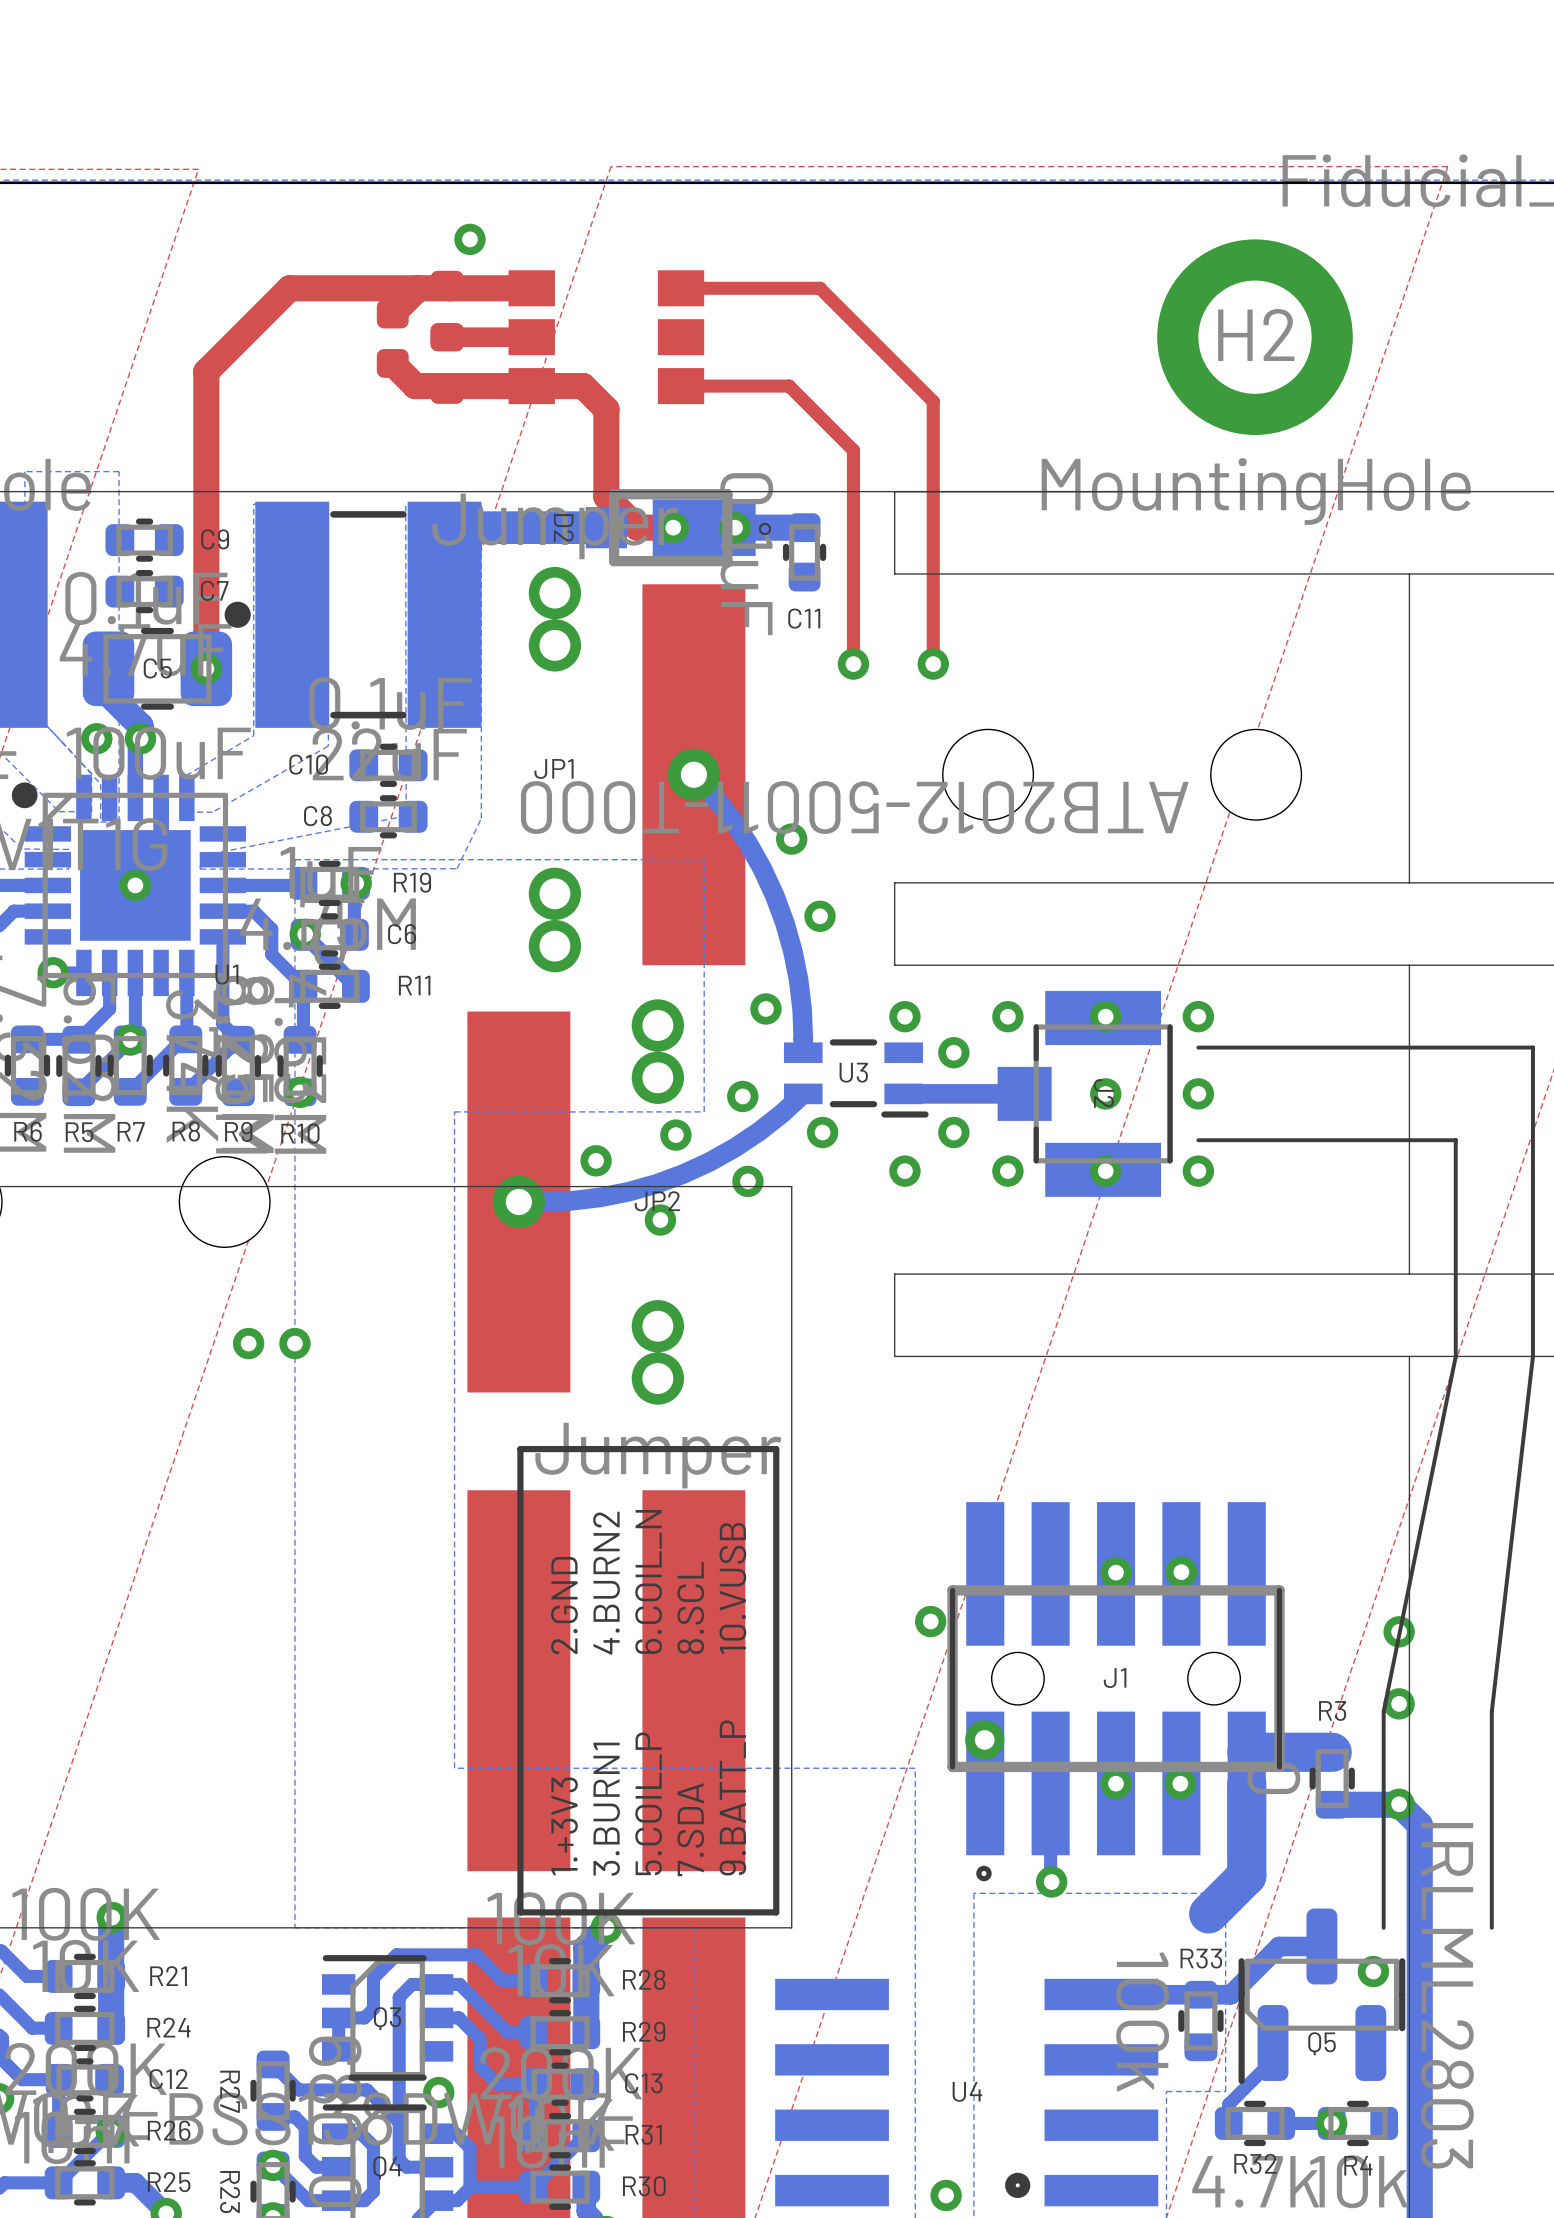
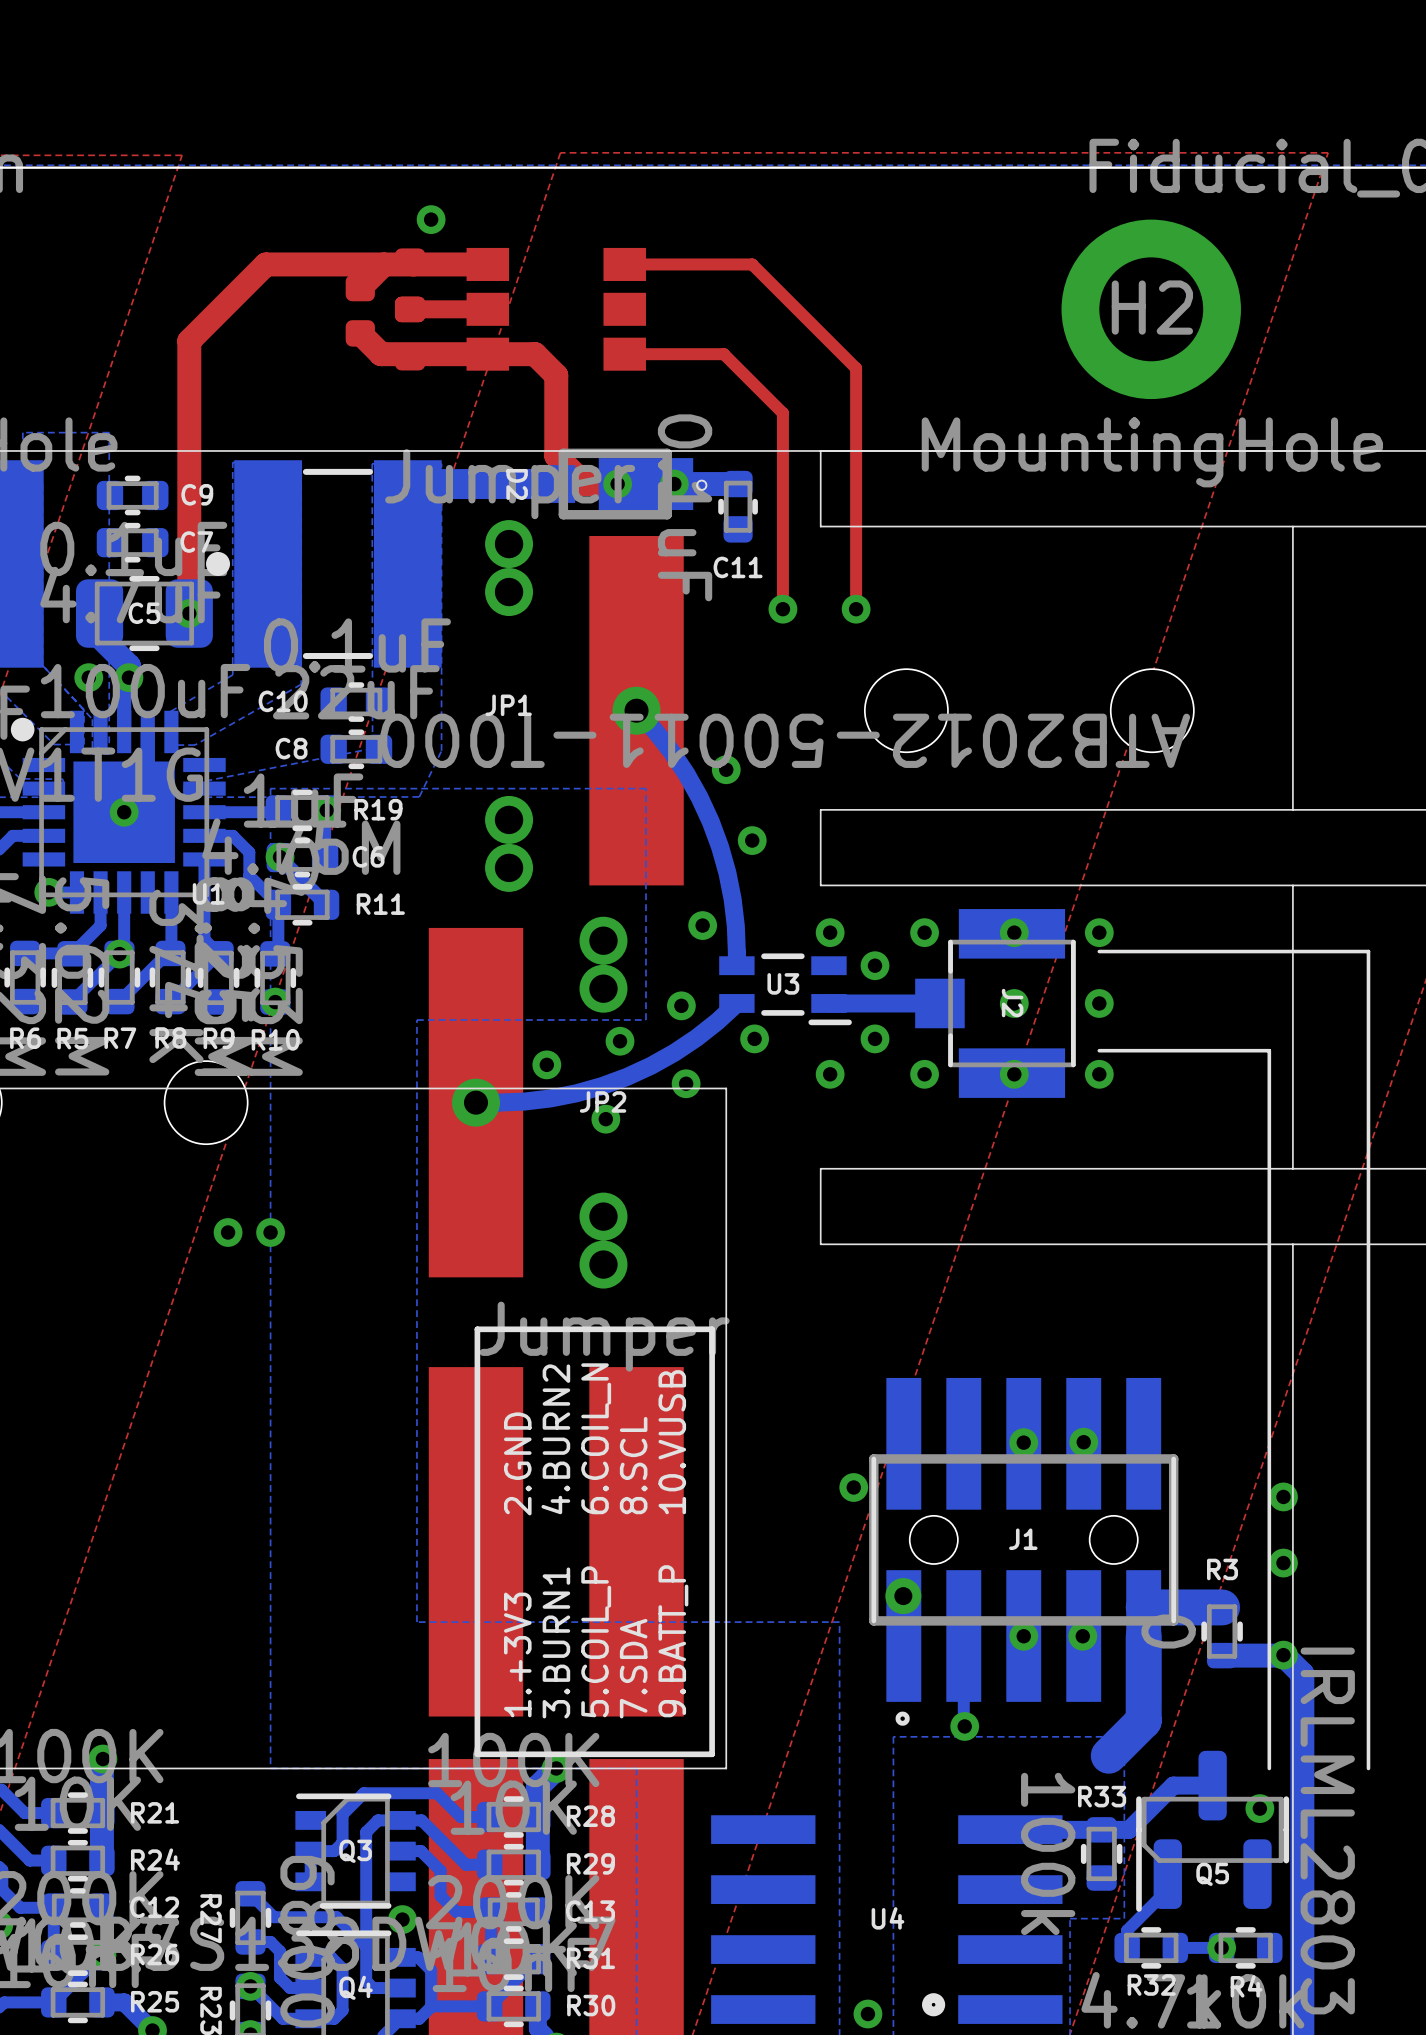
line: (1198, 1047) (1532, 1047) (1532, 1356) (1491, 1711) -> (1099, 951) (1368, 951) (1368, 1570)
line: (1198, 1140) (1455, 1140) (1455, 1356) (1383, 1711) -> (1099, 1050) (1269, 1050) (1269, 1570)

